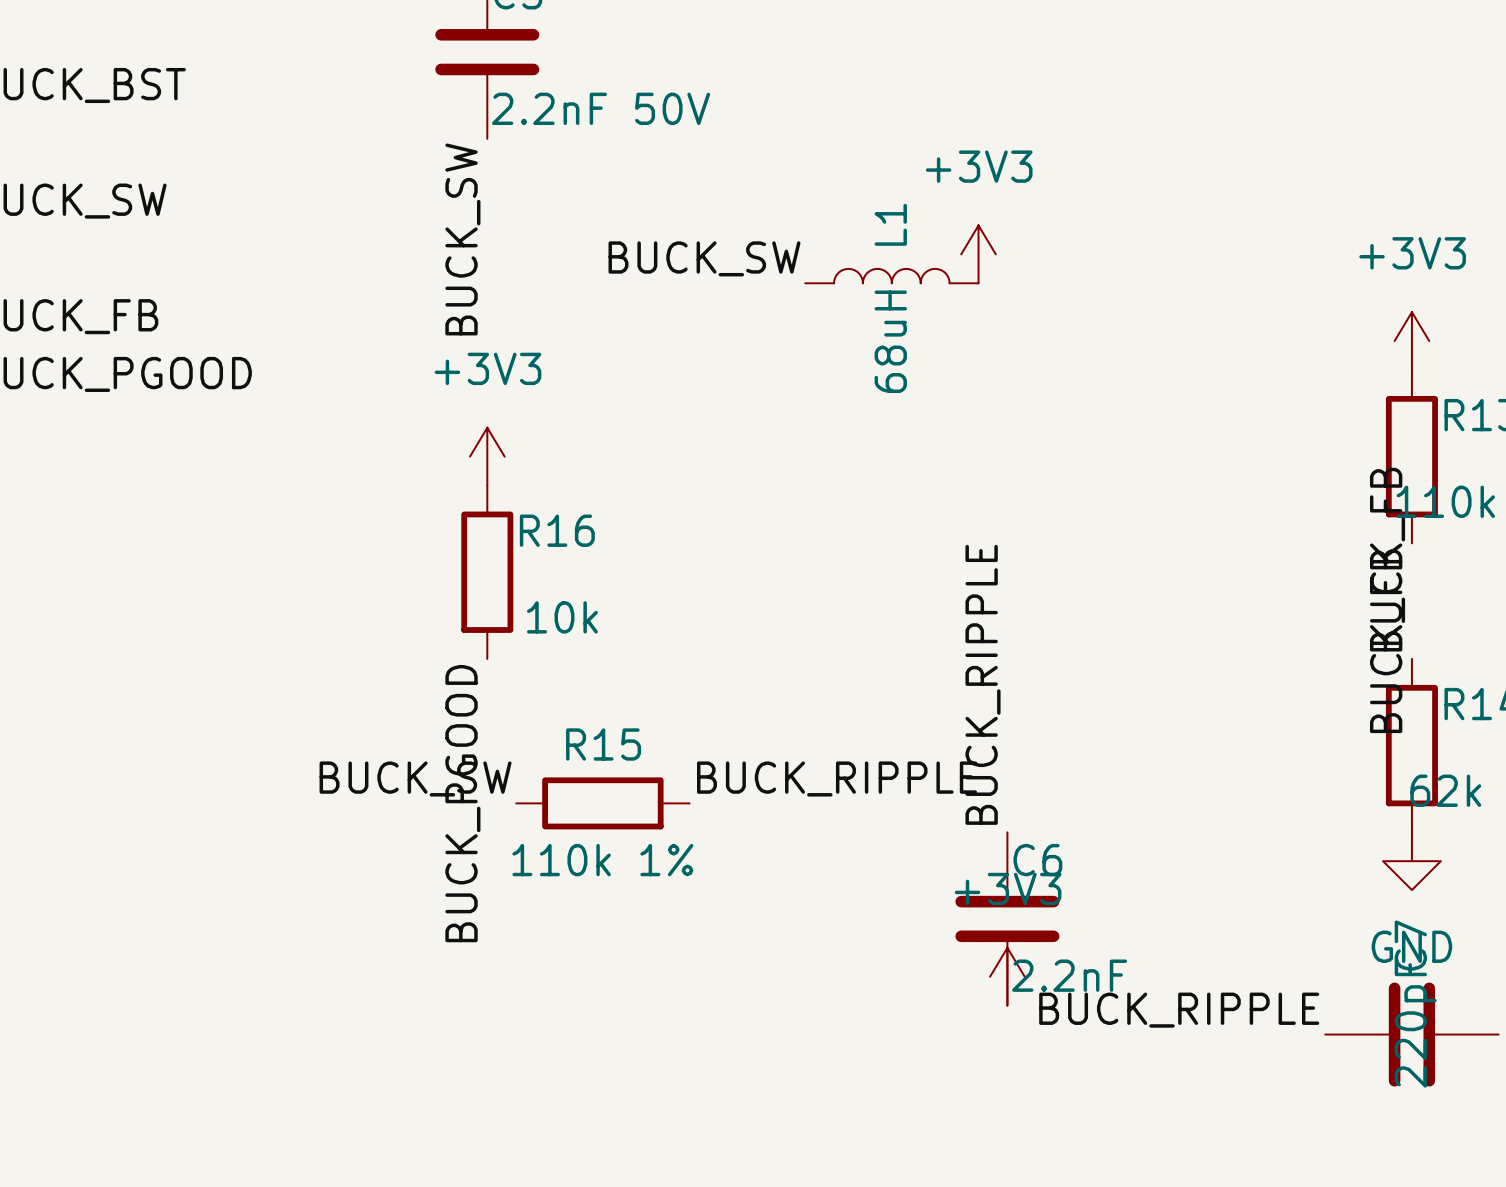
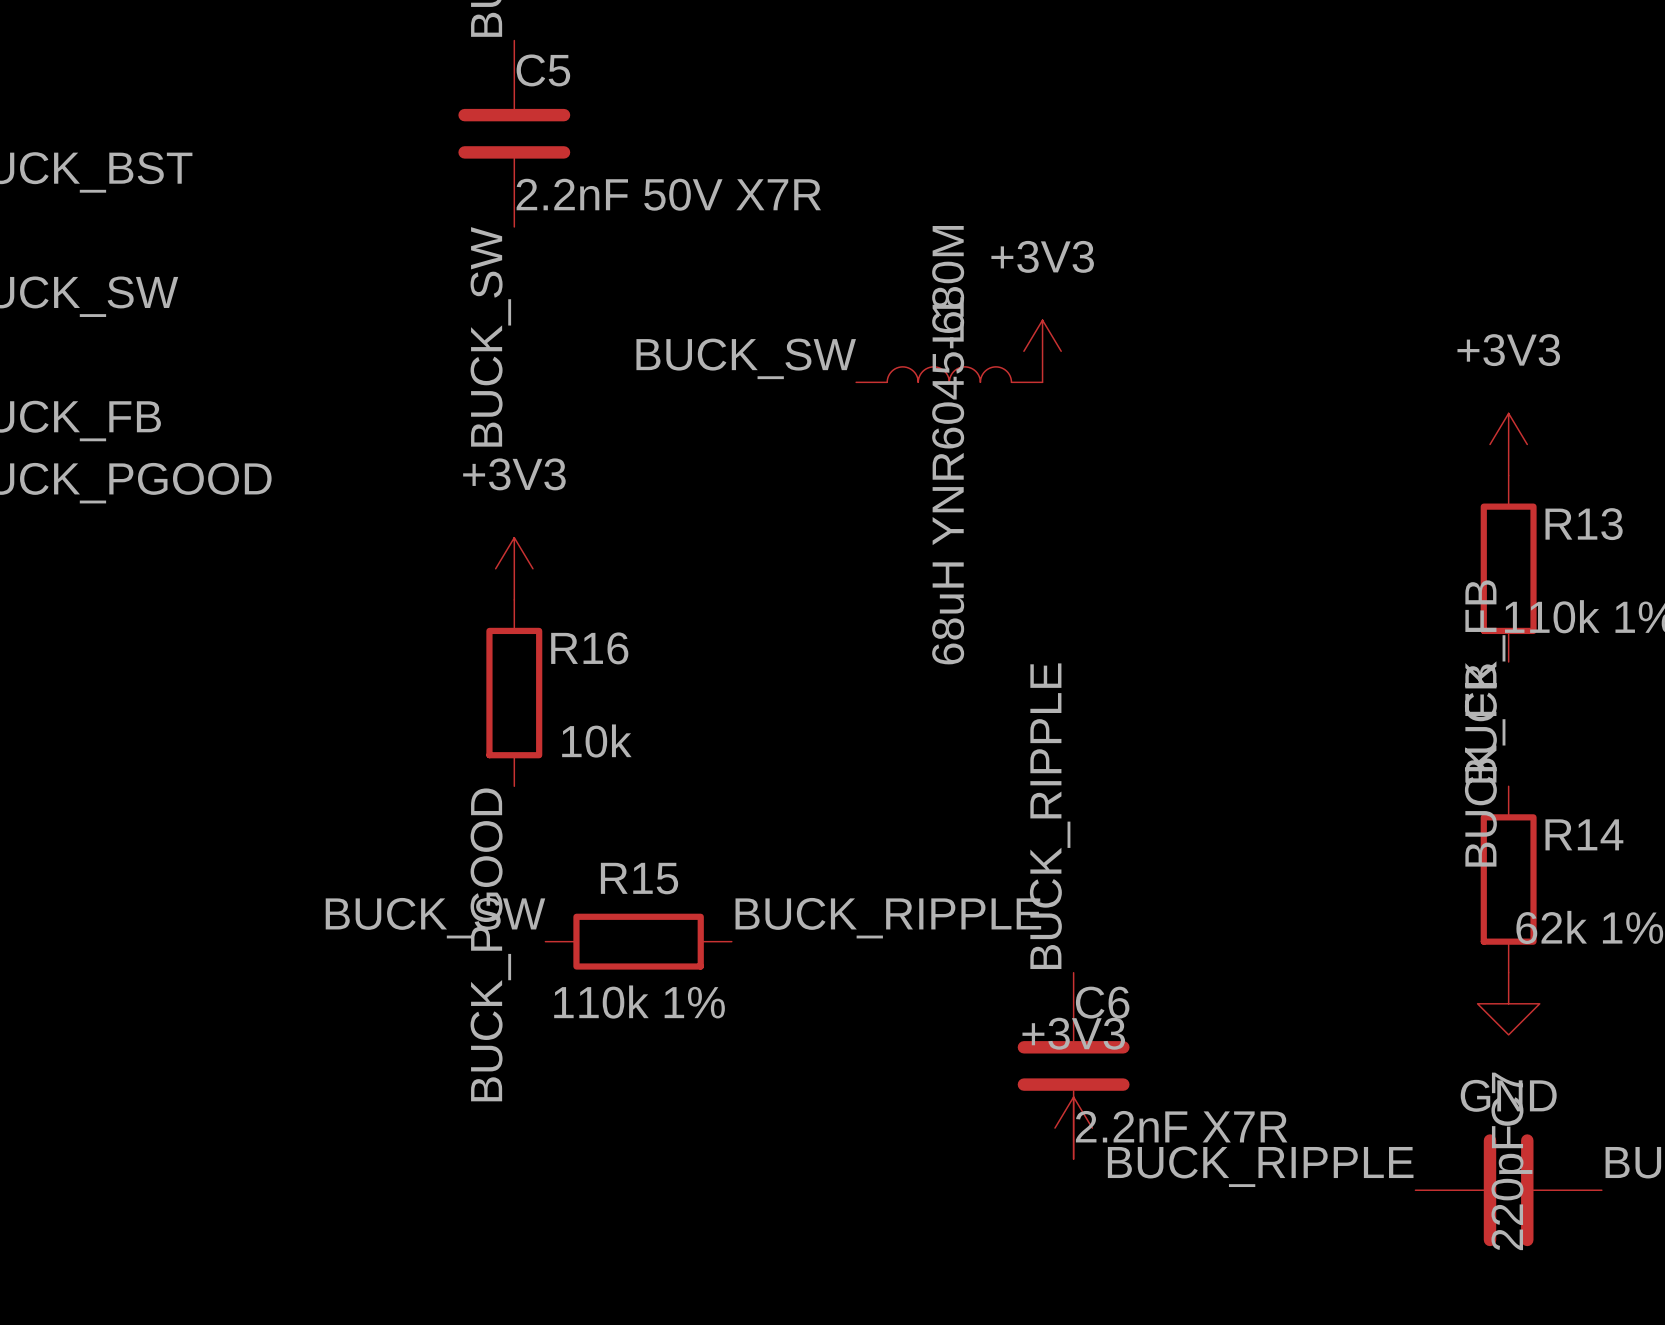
C5 value: 2.2nF 50V (601, 108) -> 2.2nF 50V X7R (668, 194)
L1 value: 68uH (890, 341) -> 68uH YNR6045-680M (948, 445)
C6 value: 2.2nF (1069, 975) -> 2.2nF X7R (1181, 1126)

